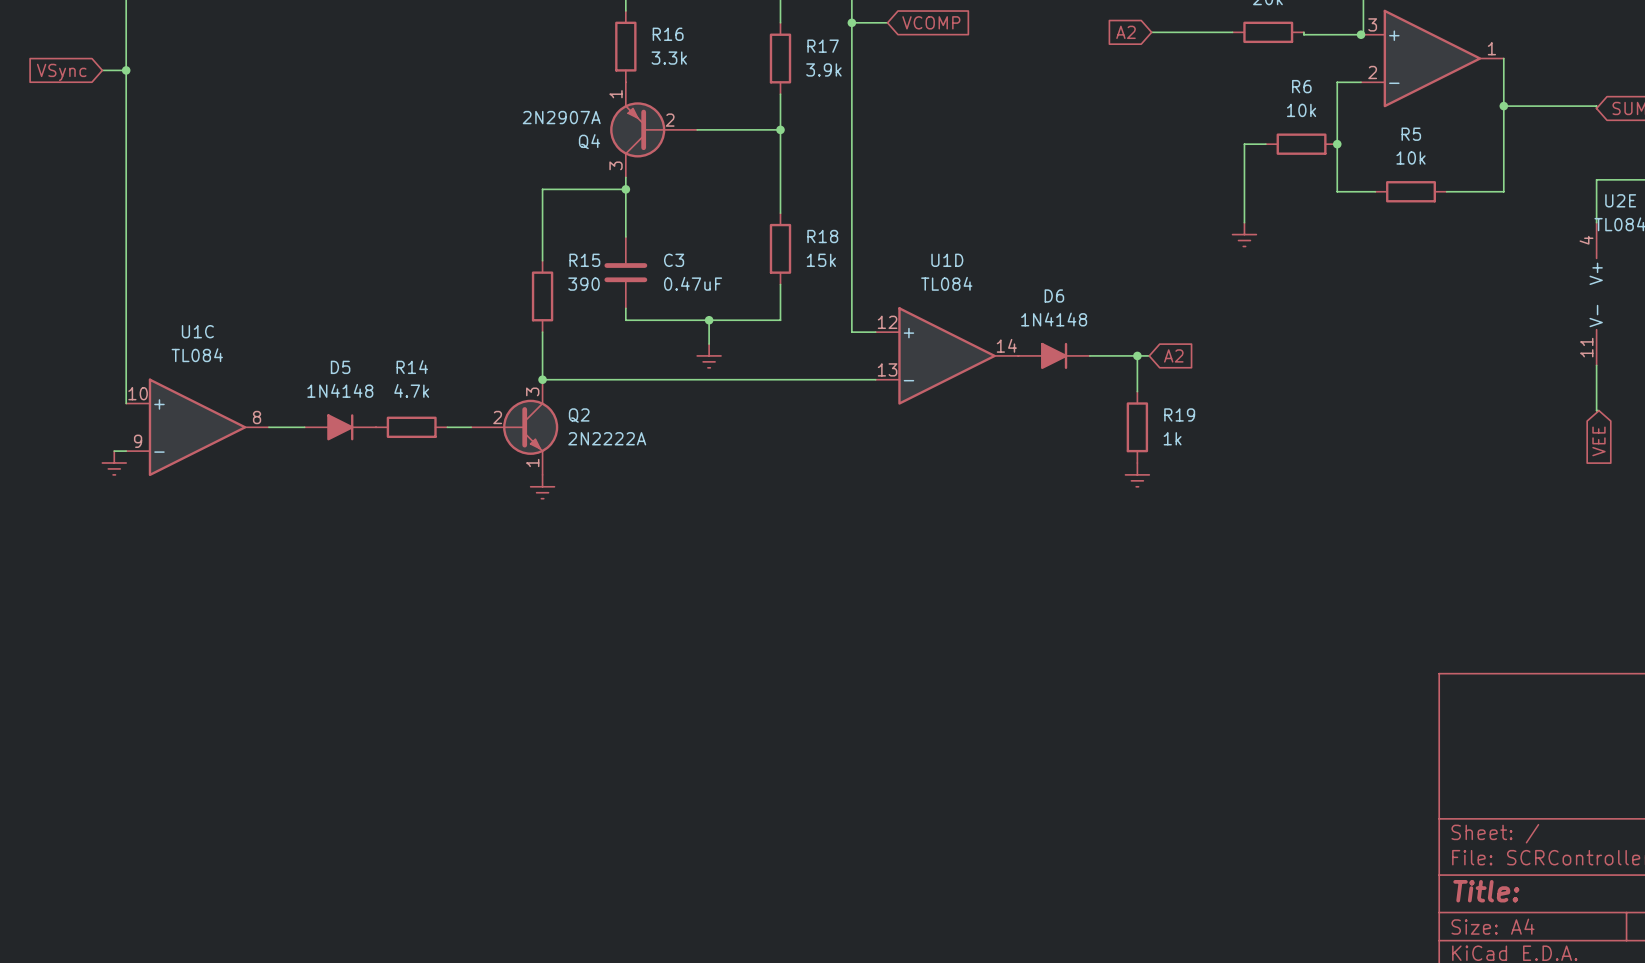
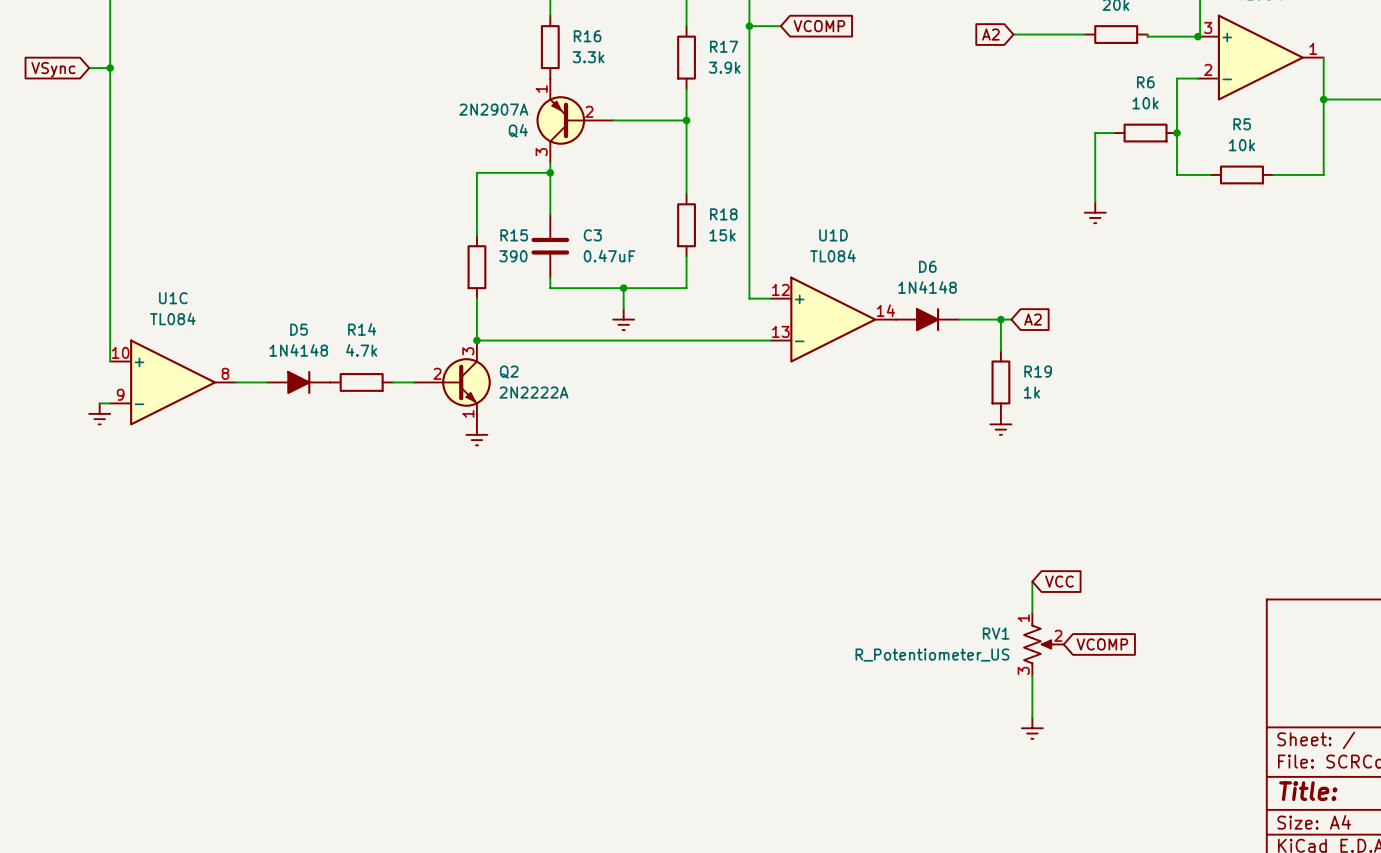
wire: none -> (1032, 581) (1032, 613)
global label: none -> VCC (1059, 581)
RV1: none -> R_Potentiometer_US (1043, 644)
global label: none -> VCOMP (1102, 644)
wire: none -> (1032, 675) (1032, 717)
power symbol: none -> (1032, 728)

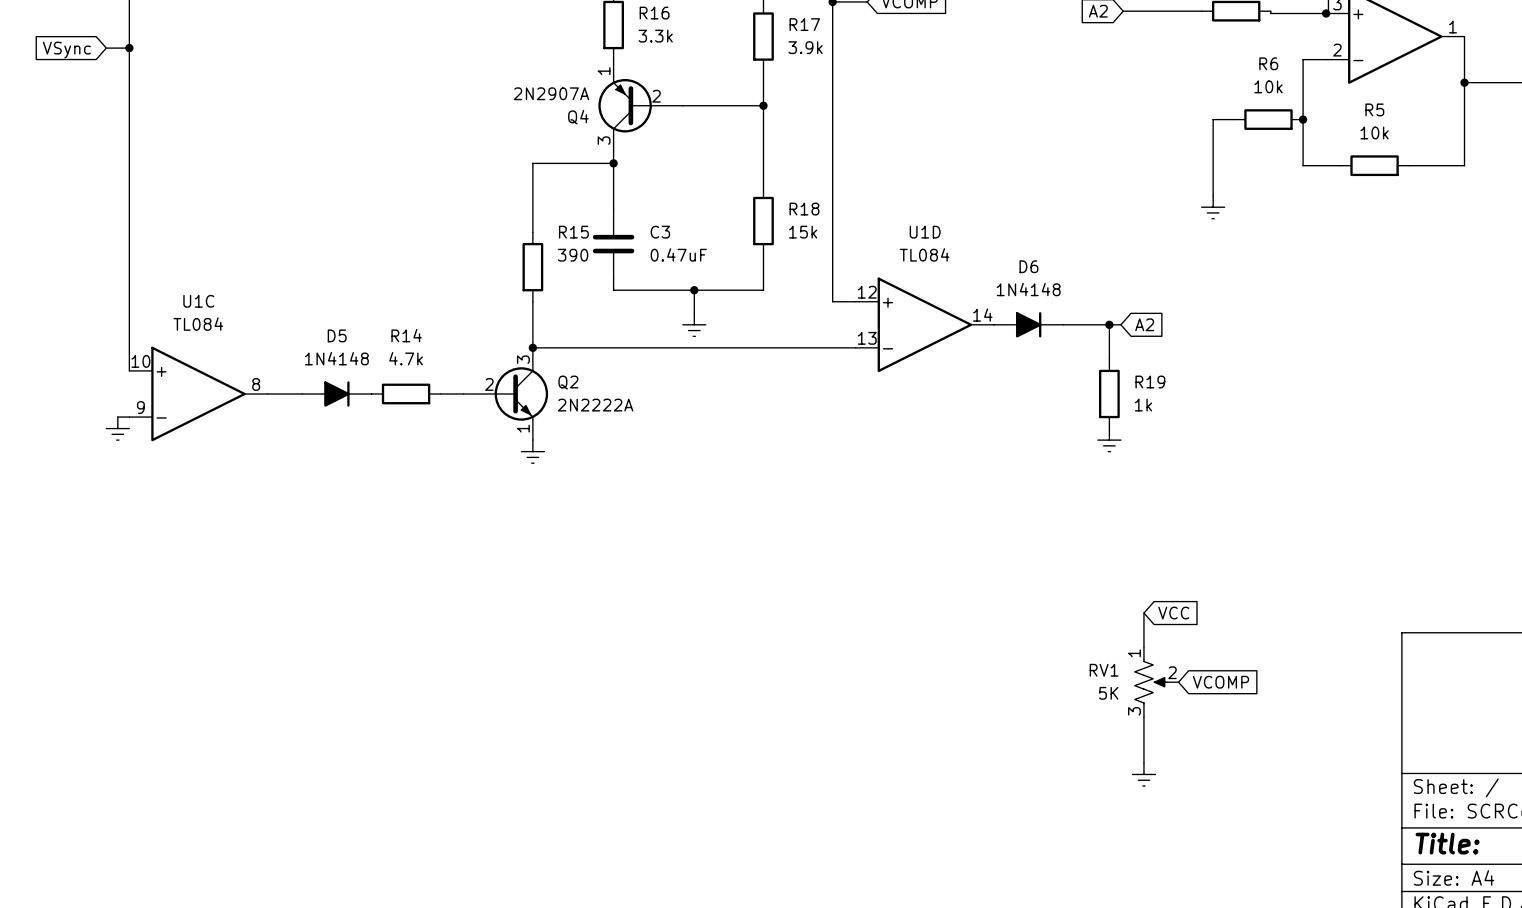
RV1 value: R_Potentiometer_US (932, 655) -> 5K (1108, 693)

